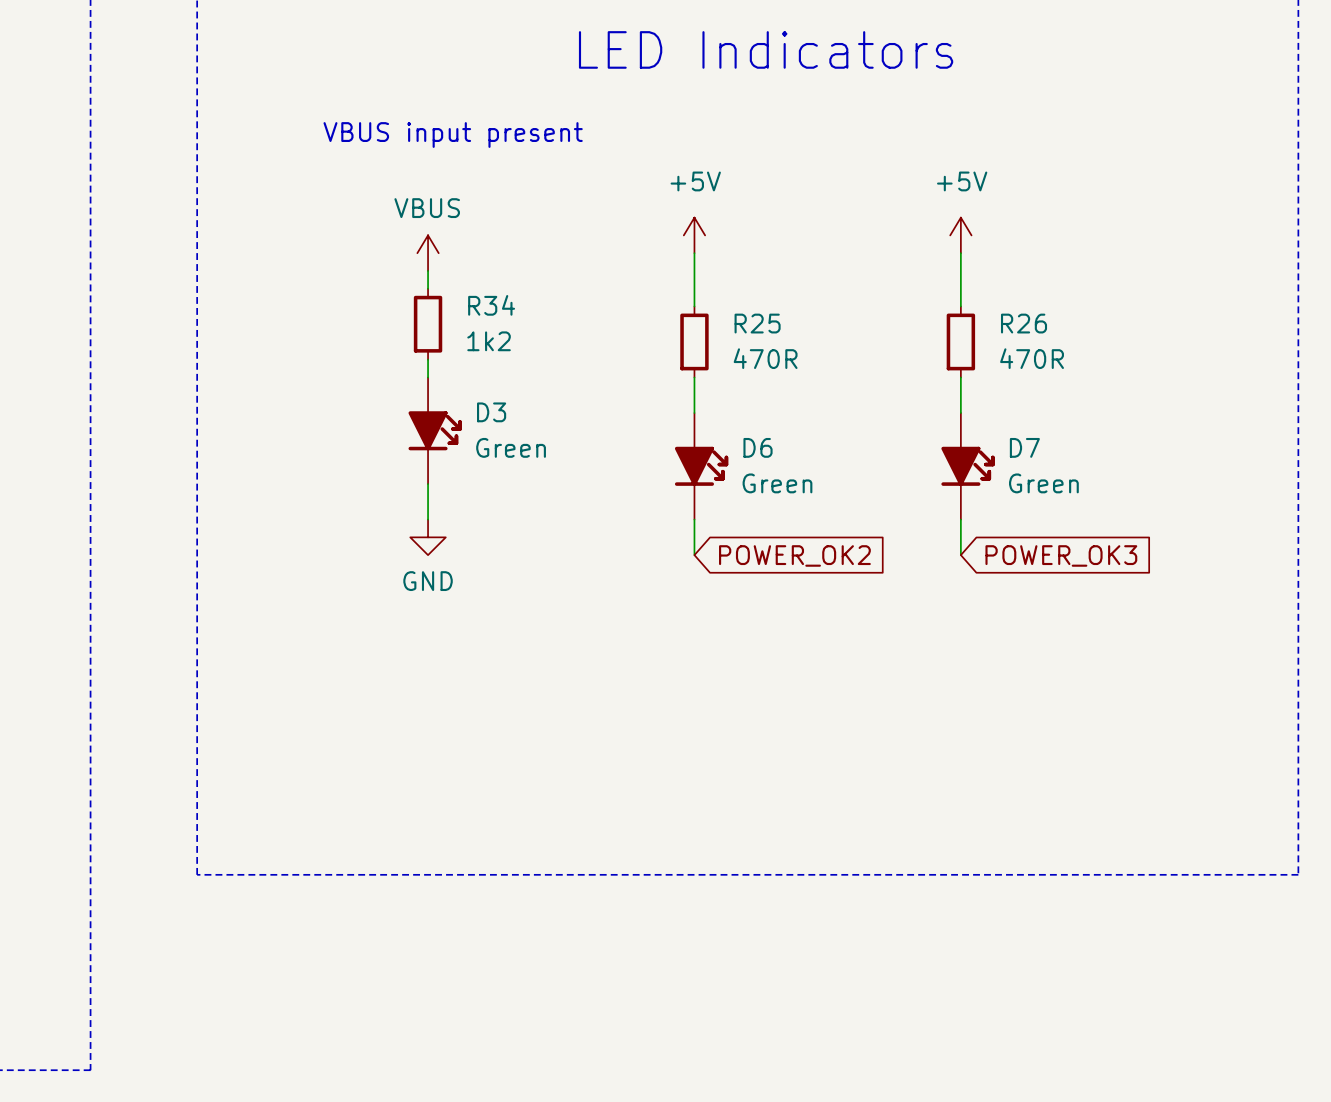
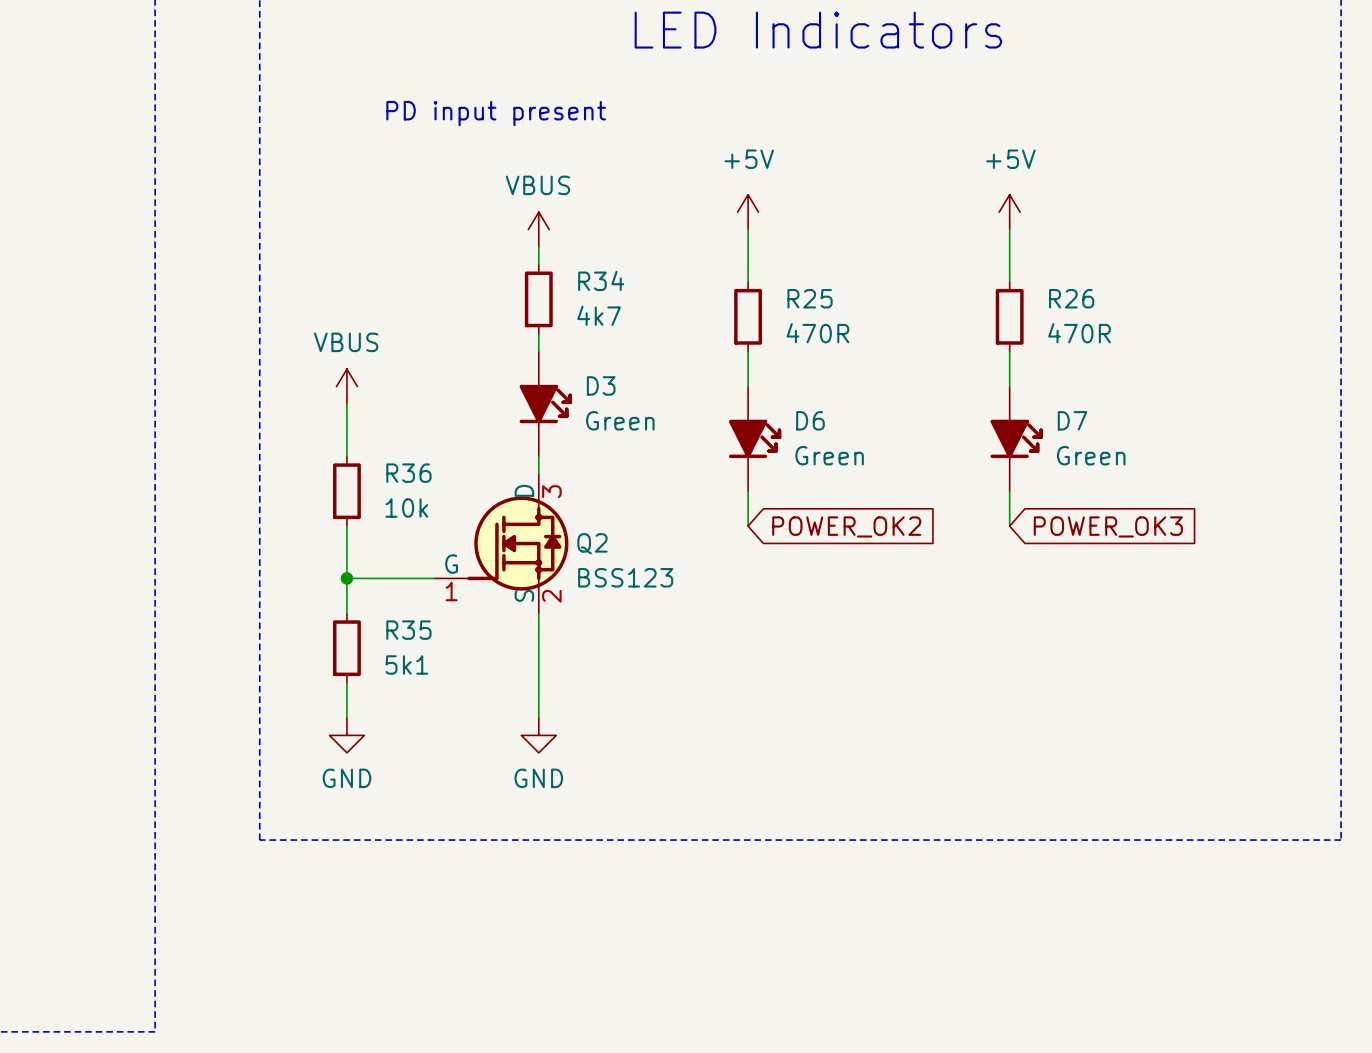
text: VBUS input present (453, 135) -> PD input present (496, 113)
power symbol position: VBUS (428, 253) -> VBUS (538, 229)
wire: (428, 270) (428, 288) -> (538, 247) (538, 264)
R34 position: (428, 324) -> (538, 299)
R34 text: 1k2 (489, 341) -> 4k7 (599, 315)
wire: (428, 359) (428, 377) -> (538, 334) (538, 351)
power symbol: none -> VBUS (346, 386)
wire: none -> (346, 404) (346, 456)
D3 position: (435, 430) -> (545, 404)
wire: (428, 484) (428, 519) -> (346, 683) (346, 717)
wire: none -> (538, 456) (538, 473)
R36: none -> (346, 491)
power symbol: GND (428, 537) -> none
wire: none -> (346, 526) (346, 613)
Q2: none -> BSS123 (501, 543)
wire: none -> (346, 578) (434, 578)
junction: none -> (346, 578)
wire: none -> (538, 613) (538, 717)
R35: none -> (346, 648)
power symbol: none -> GND (346, 735)
power symbol: none -> GND (538, 735)

